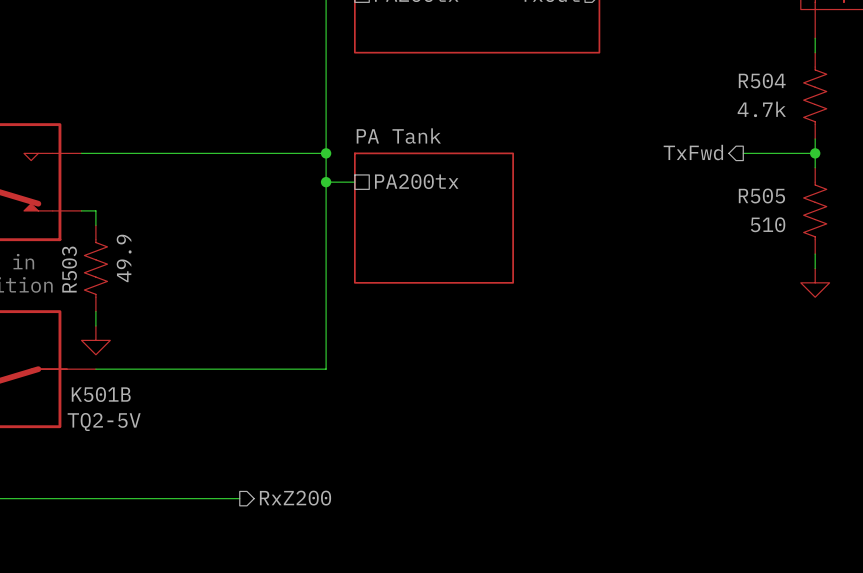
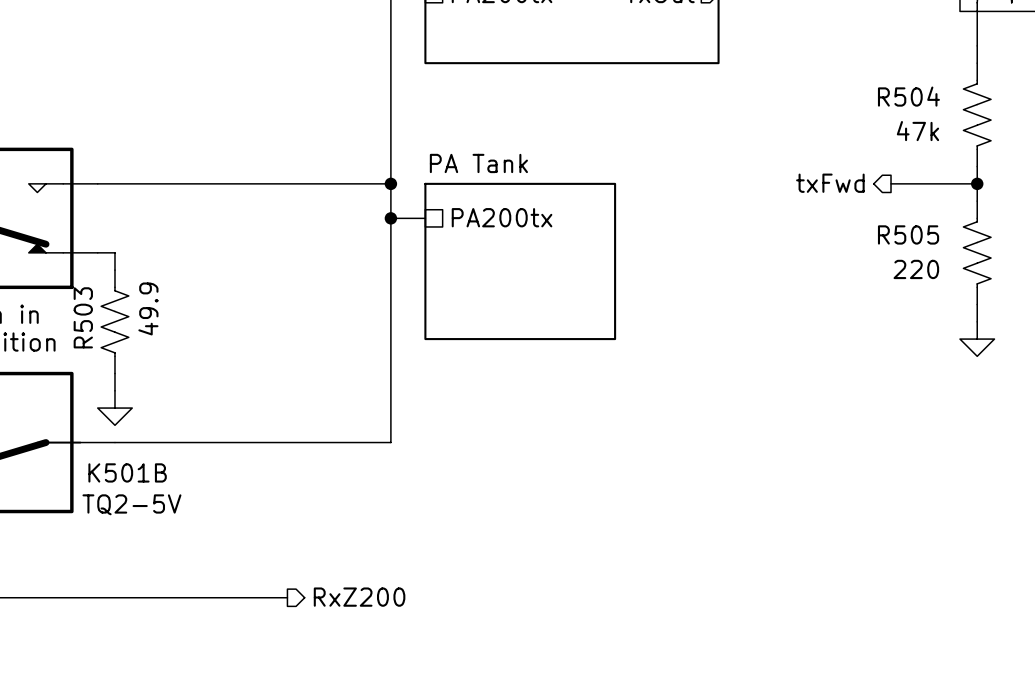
R504 flip: as is (815, 95) -> left-right (977, 114)
R504 value: 4.7k (761, 109) -> 47k (917, 131)
hierarchical label: TxFwd (693, 152) -> txFwd (830, 183)
R505 flip: as is (815, 210) -> left-right (977, 252)
R505 value: 510 (768, 224) -> 220 (916, 269)

